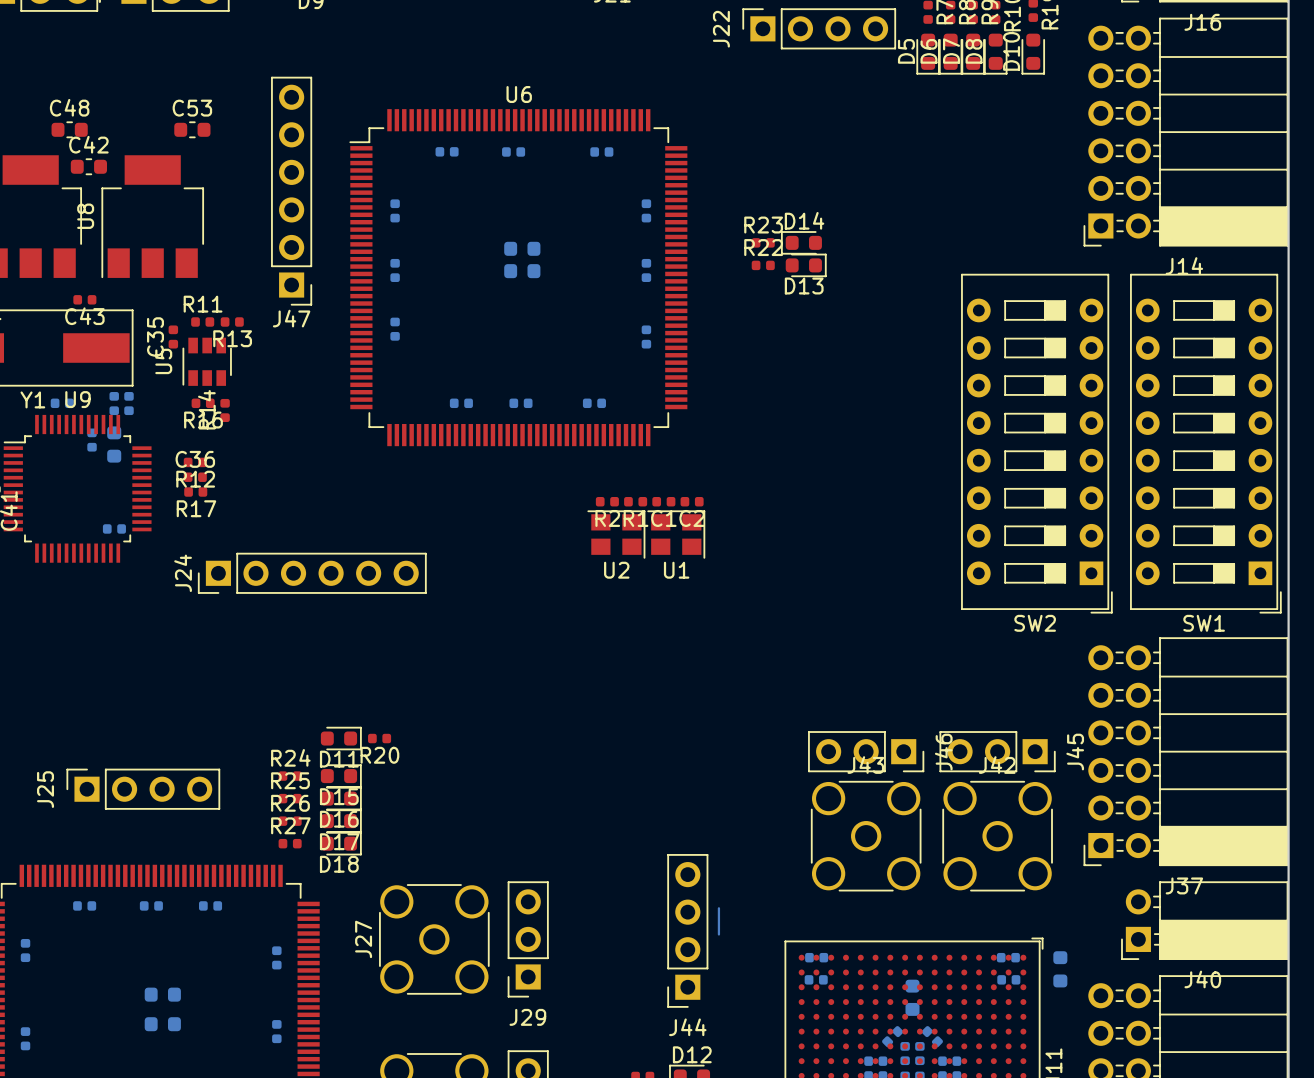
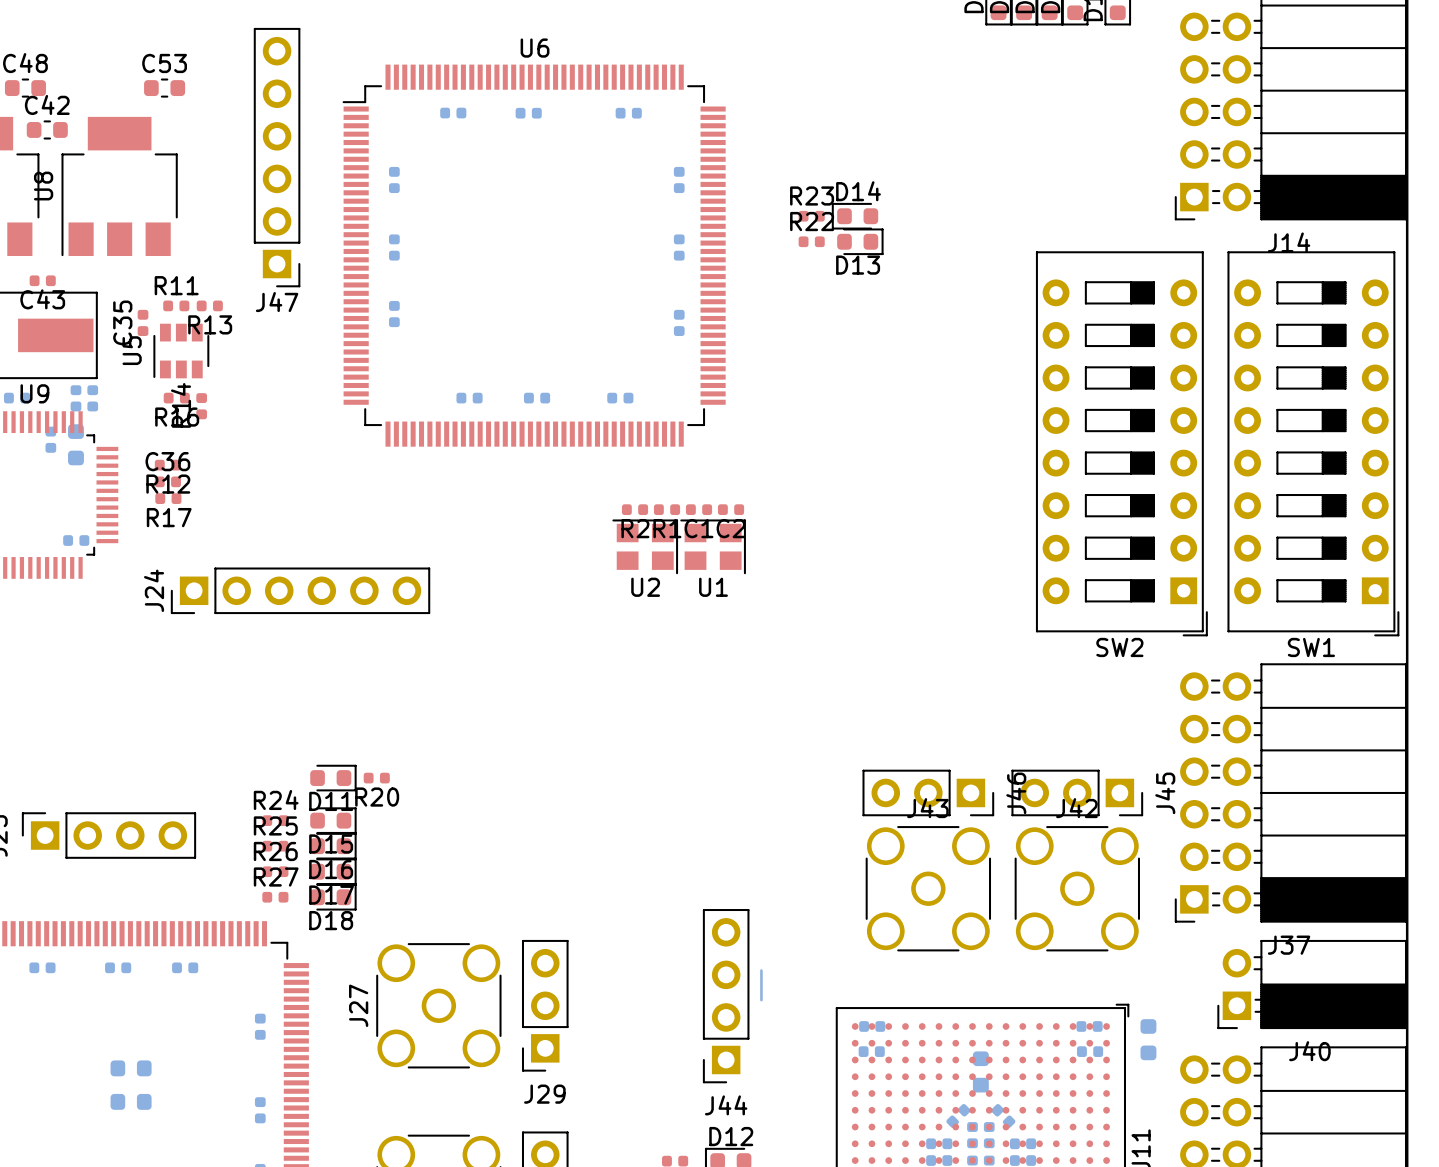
part: (522, 248) -> none
part: (522, 271) -> none

